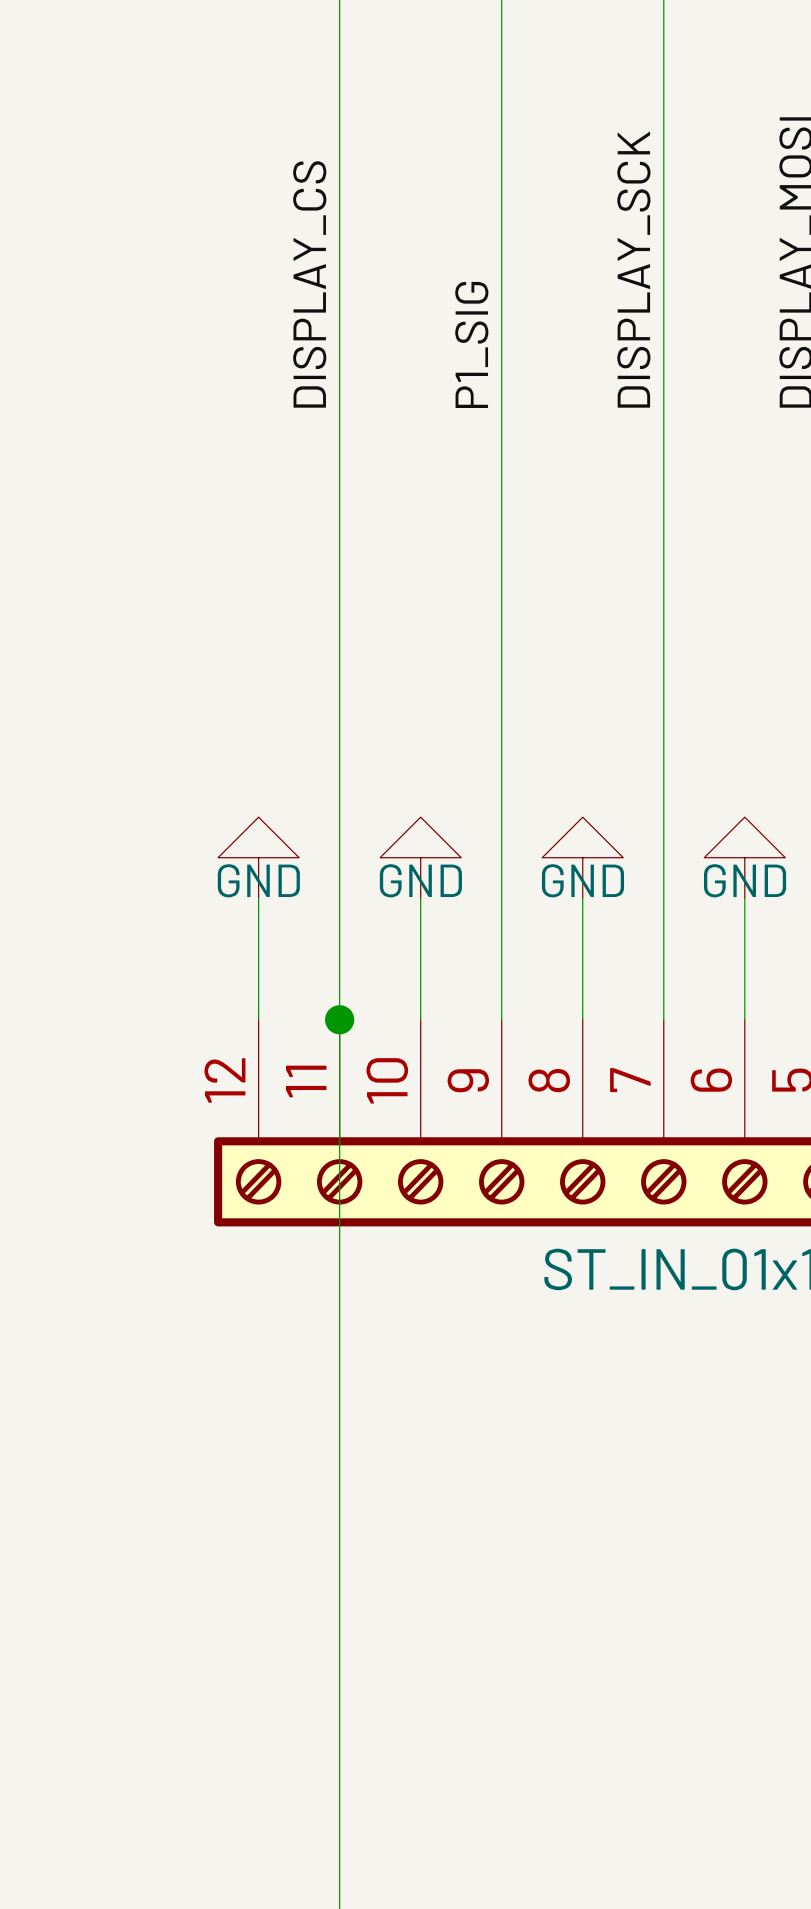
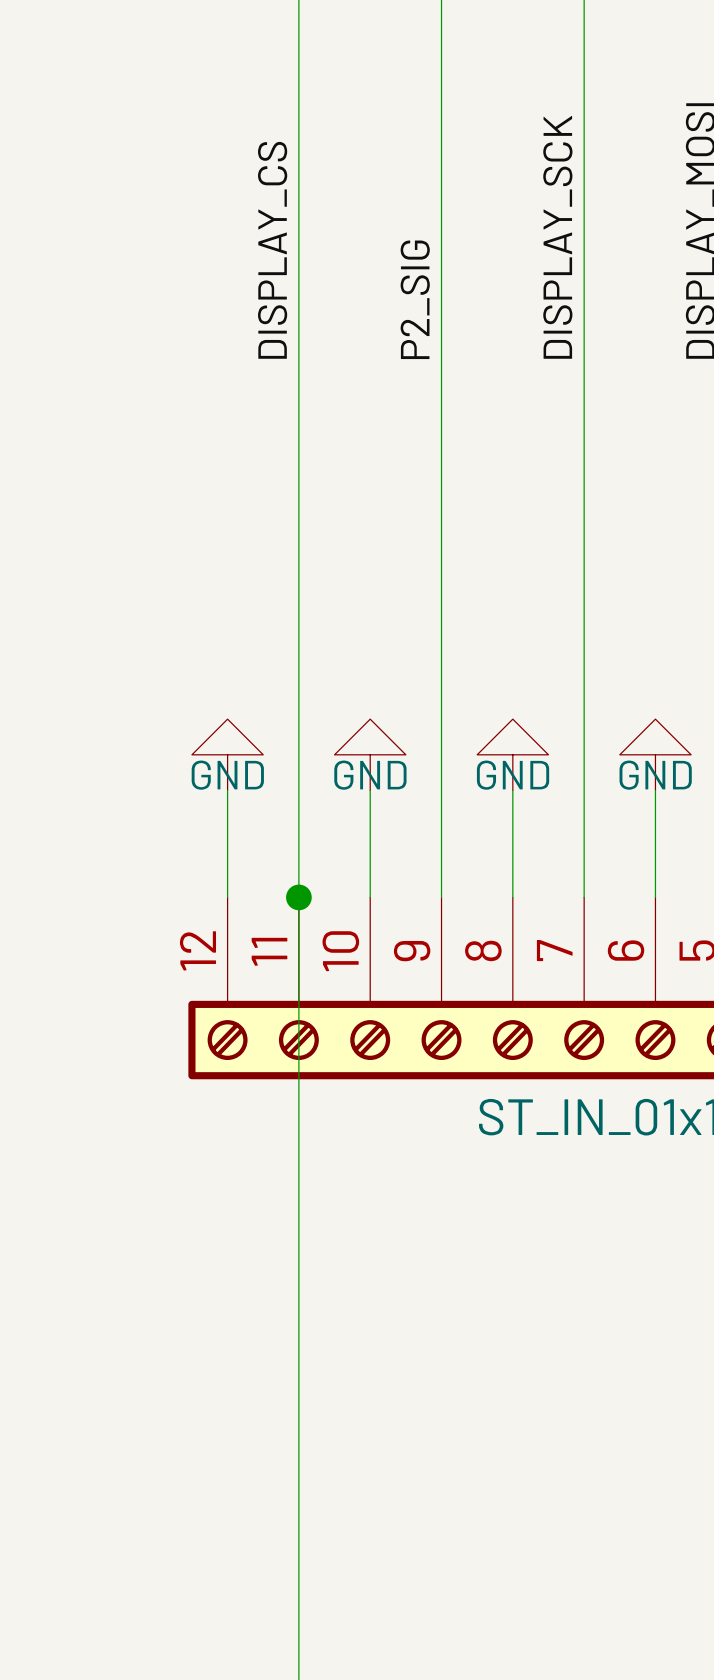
label: P1_SIG (471, 344) -> P2_SIG (415, 299)

